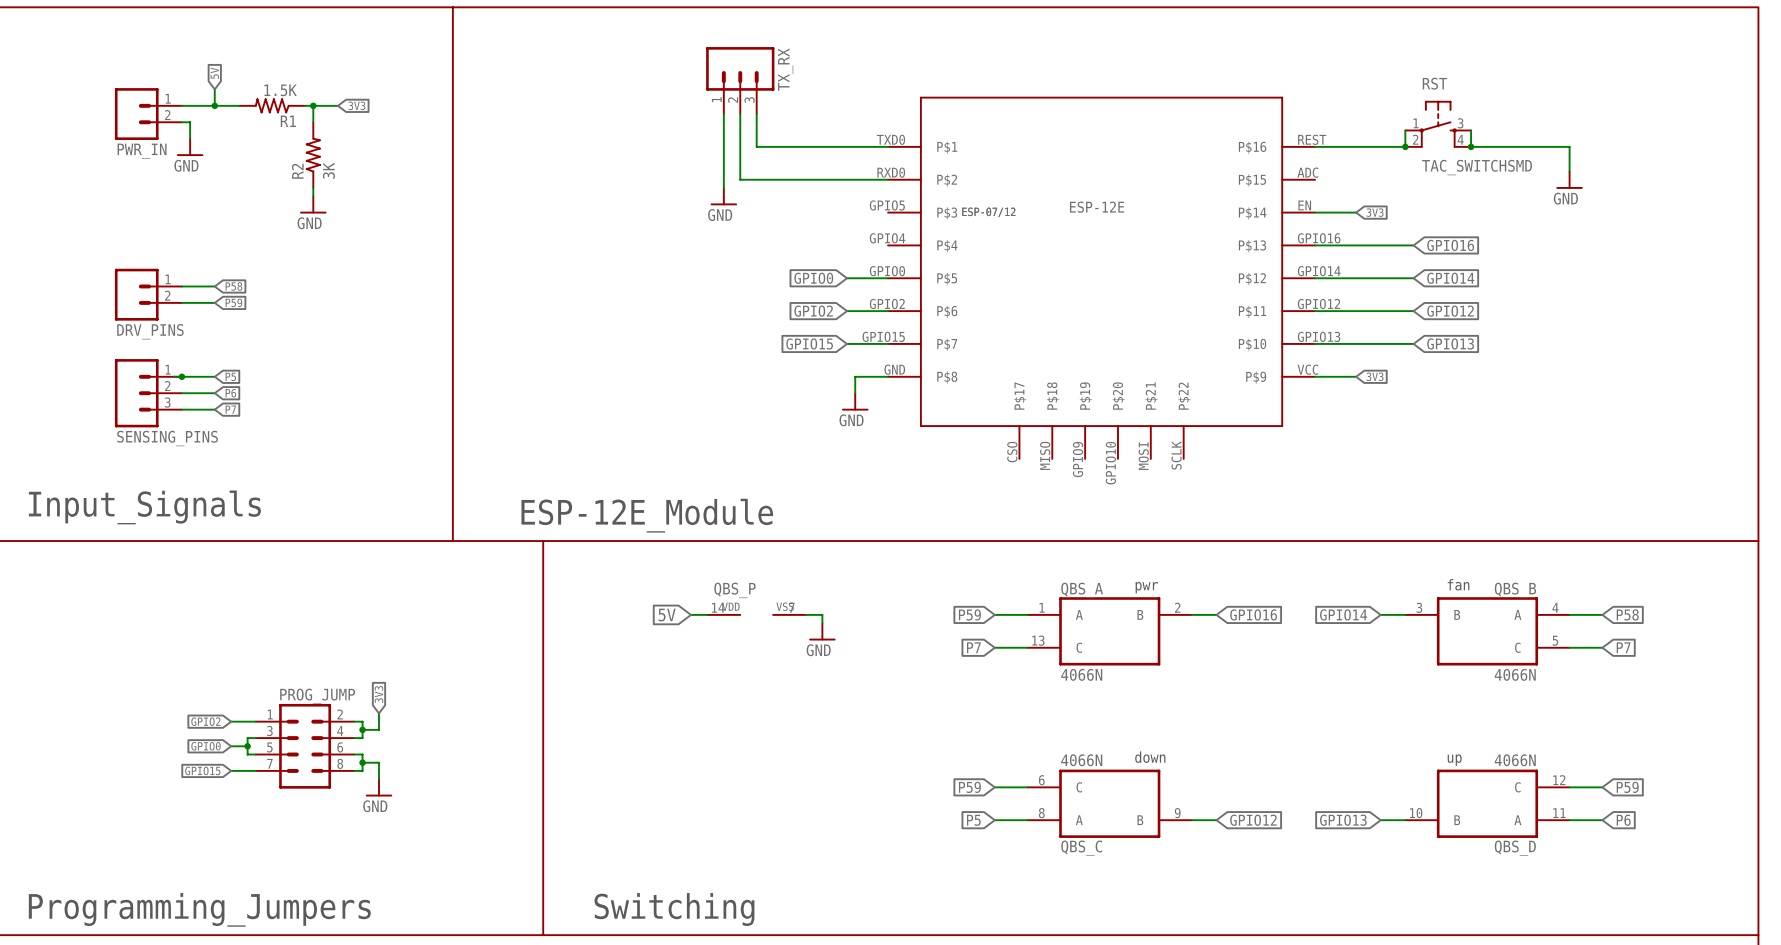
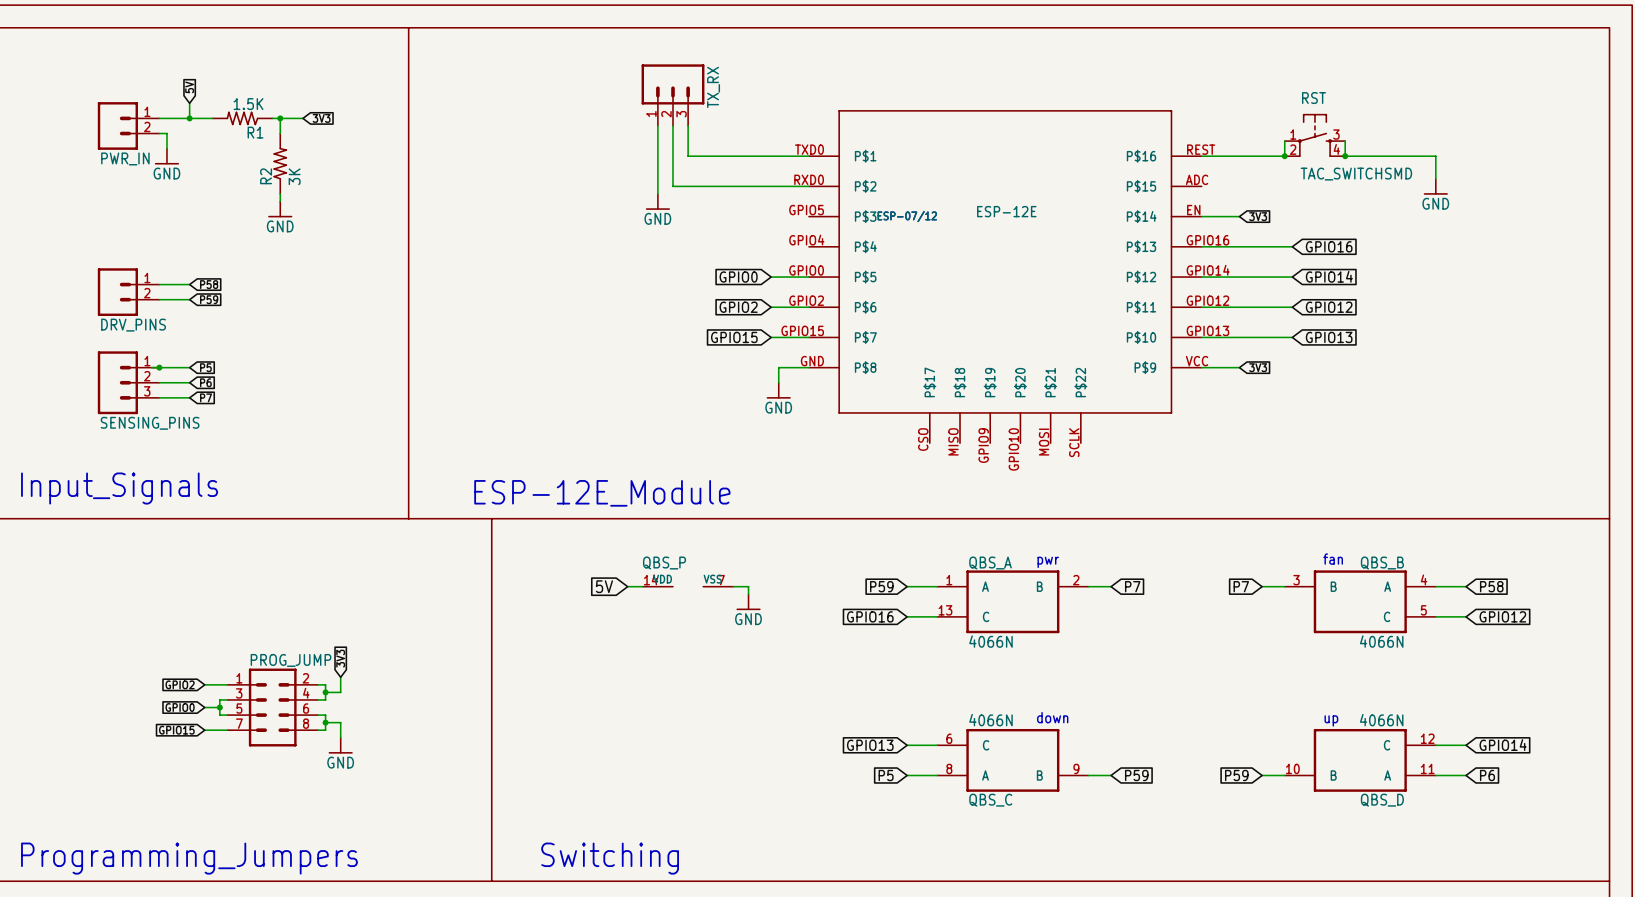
global label: GPIO16 (1253, 614) -> P7 (1132, 586)
global label: GPIO14 (1343, 614) -> P7 (1241, 586)
global label: P7 (973, 647) -> GPIO16 (870, 616)
global label: P7 (1623, 647) -> GPIO12 (1502, 616)
global label: P59 (969, 787) -> GPIO13 (870, 745)
global label: P59 (1627, 787) -> GPIO14 (1503, 745)
global label: GPIO12 (1253, 820) -> P59 (1136, 775)
global label: GPIO13 (1343, 820) -> P59 (1236, 775)

